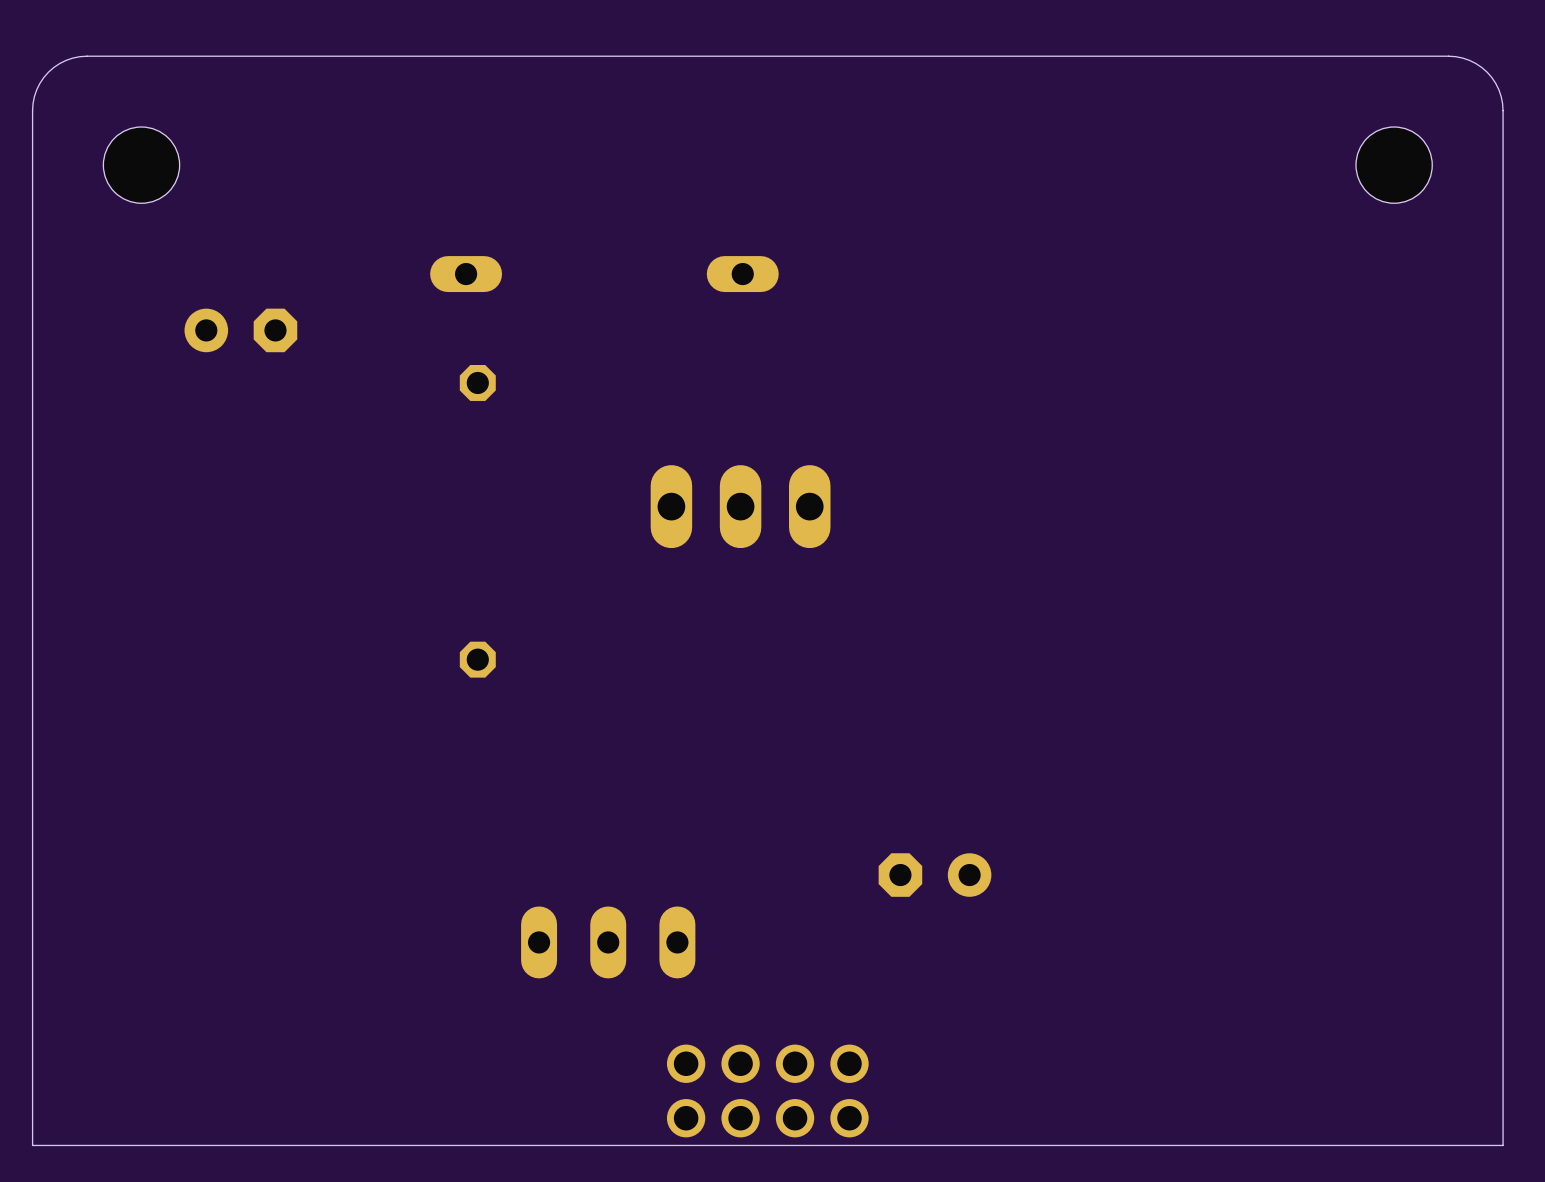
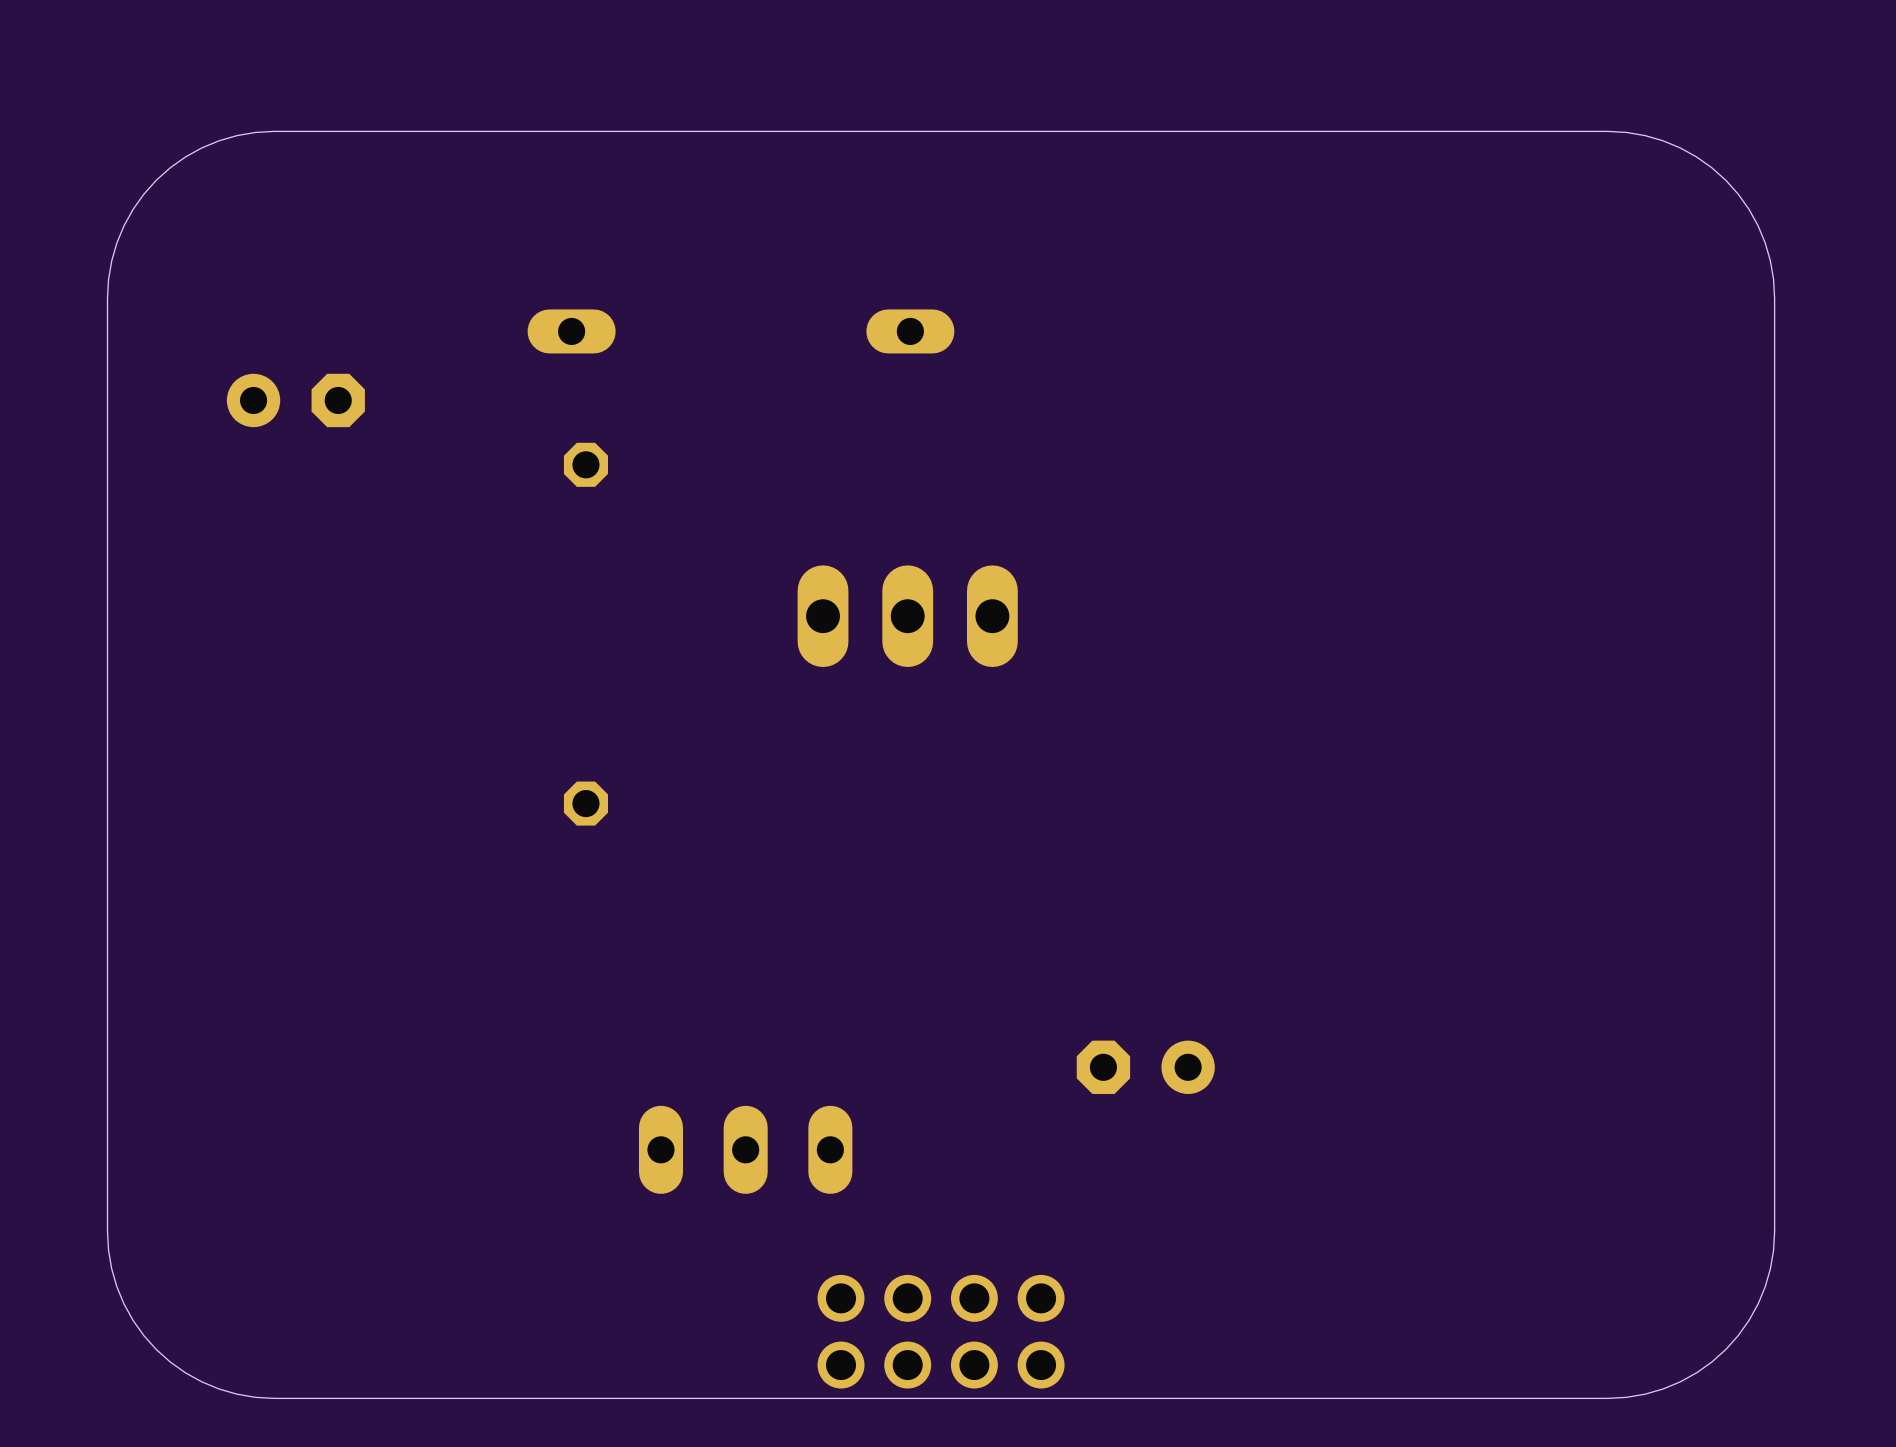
hole: (141, 165) -> none
hole: (1394, 165) -> none
board edge: (1312, 1145) (1503, 1145) (1503, 110) (1498, 89) (1491, 77) (1475, 63) (1455, 56) (87, 56) (66, 60) (48, 72) (36, 89) (32, 110) (32, 1145) (223, 1145) -> (1607, 1398) (1626, 1397) (1662, 1389) (1696, 1372) (1725, 1349) (1749, 1320) (1765, 1286) (1773, 1250) (1774, 1231) (1773, 279) (1765, 243) (1749, 209) (1738, 194) (1711, 167) (1696, 156) (1662, 140) (1626, 132) (1607, 131) (274, 131) (255, 132) (219, 140) (185, 156) (156, 180) (133, 209) (116, 243) (108, 279) (107, 298) (108, 1250) (116, 1286) (133, 1320) (143, 1335) (170, 1362) (185, 1372) (219, 1389) (255, 1397) (274, 1398)

